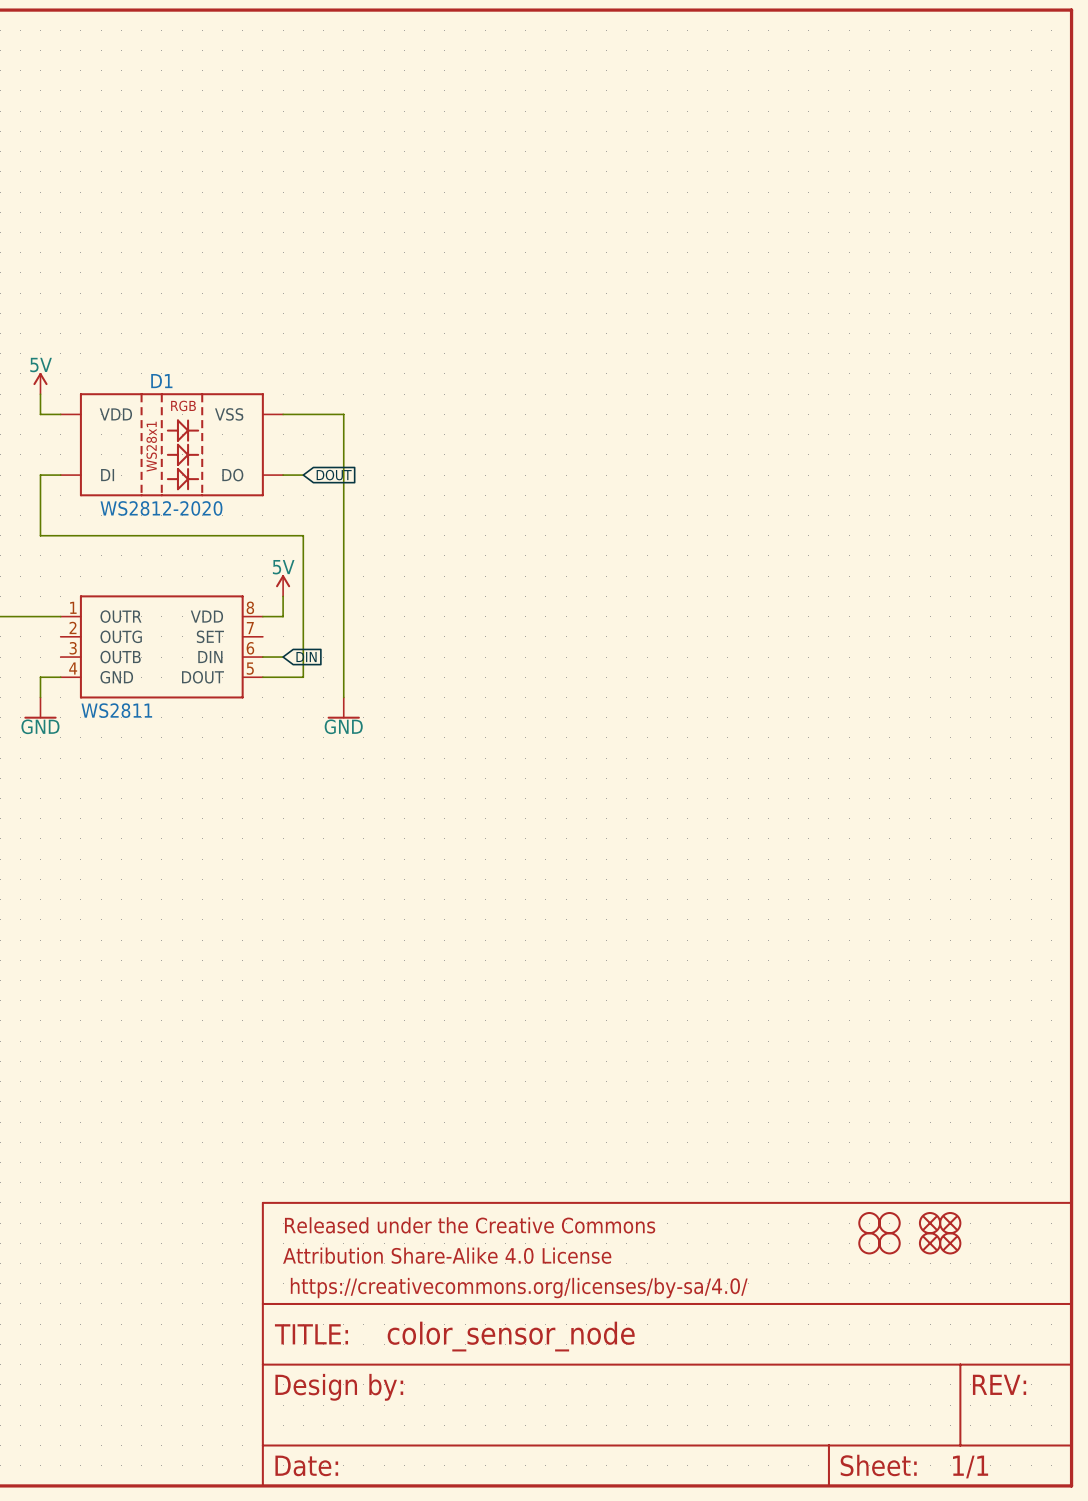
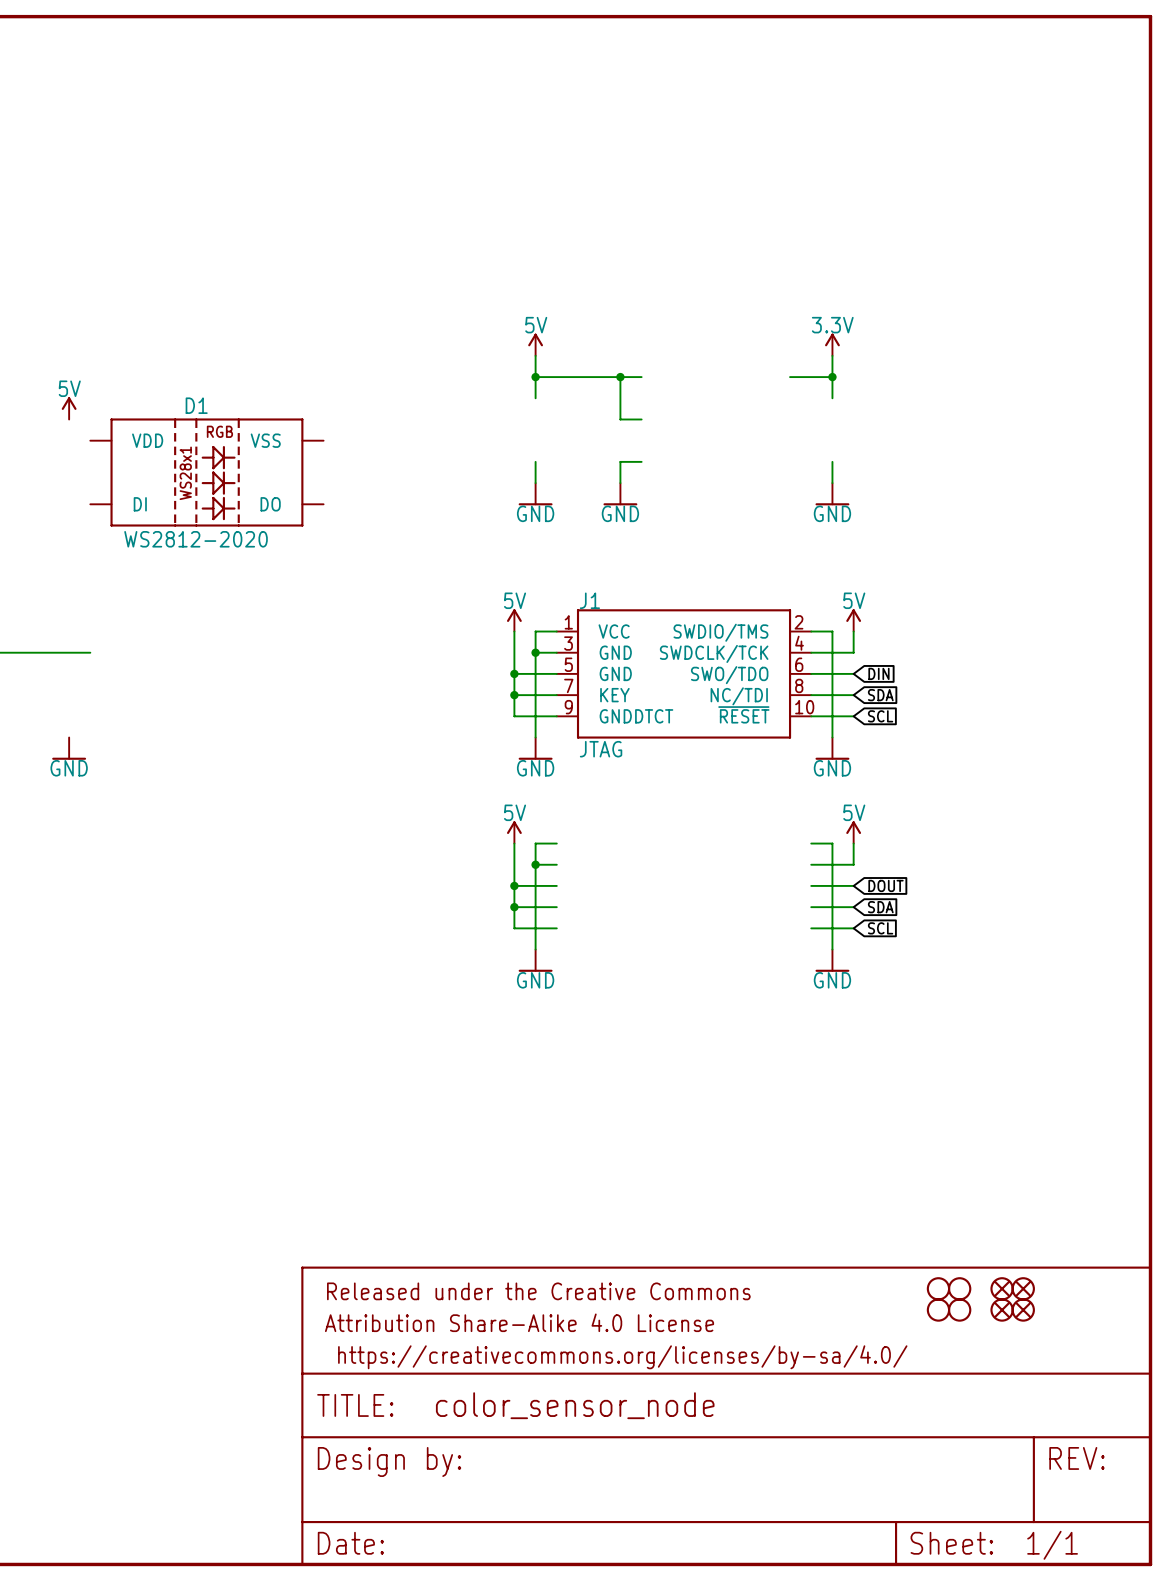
power symbol: none -> 5V (535, 344)
power symbol: none -> 3.3V (832, 344)
wire: none -> (535, 355) (535, 398)
wire: none -> (832, 355) (832, 398)
wire: none -> (535, 377) (641, 377)
junction: none -> (535, 377)
wire: none -> (620, 377) (620, 419) (641, 419)
junction: none -> (620, 377)
wire: none -> (790, 377) (832, 377)
junction: none -> (832, 377)
wire: (40, 394) (40, 414) (60, 414) -> none
wire: (283, 414) (343, 414) (343, 697) -> none
wire: none -> (535, 461) (535, 483)
wire: none -> (641, 461) (620, 461) (620, 483)
wire: none -> (832, 461) (832, 483)
power symbol: none -> GND (535, 494)
power symbol: none -> GND (620, 494)
power symbol: none -> GND (832, 494)
wire: (60, 475) (40, 475) (40, 535) (303, 535) (303, 677) (262, 677) -> none
wire: (283, 475) (303, 475) -> none
global label: DOUT (334, 475) -> none
power symbol: 5V (283, 585) -> none
power symbol: none -> 5V (514, 620)
power symbol: none -> 5V (853, 620)
wire: (283, 596) (283, 616) (262, 616) -> none
wire: none -> (514, 631) (514, 716) (556, 716)
wire: none -> (556, 631) (535, 631) (535, 737)
wire: none -> (811, 631) (832, 631) (832, 737)
wire: none -> (853, 631) (853, 652) (811, 652)
wire: none -> (535, 652) (556, 652)
junction: none -> (535, 652)
wire: none -> (514, 673) (556, 673)
junction: none -> (514, 673)
J1: none -> JTAG (684, 673)
wire: none -> (811, 673) (853, 673)
global label: none -> DIN (878, 673)
part: (161, 646) -> none
wire: (262, 657) (283, 657) -> none
global label: DIN (306, 657) -> none
wire: none -> (514, 695) (556, 695)
junction: none -> (514, 695)
wire: none -> (811, 695) (853, 695)
global label: none -> SDA (880, 695)
wire: (60, 677) (40, 677) (40, 697) -> none
wire: none -> (811, 716) (853, 716)
global label: none -> SCL (880, 716)
power symbol: GND (343, 708) -> none
power symbol: none -> GND (535, 748)
power symbol: none -> GND (832, 748)
power symbol: none -> 5V (514, 832)
power symbol: none -> 5V (853, 832)
wire: none -> (514, 843) (514, 928) (556, 928)
wire: none -> (556, 843) (535, 843) (535, 949)
wire: none -> (811, 843) (832, 843) (832, 949)
wire: none -> (853, 843) (853, 864) (811, 864)
wire: none -> (535, 864) (556, 864)
junction: none -> (535, 864)
wire: none -> (514, 885) (556, 885)
junction: none -> (514, 885)
wire: none -> (811, 885) (853, 885)
global label: none -> DOUT (886, 885)
wire: none -> (514, 907) (556, 907)
junction: none -> (514, 907)
wire: none -> (811, 907) (853, 907)
global label: none -> SDA (880, 907)
wire: none -> (811, 928) (853, 928)
global label: none -> SCL (880, 928)
power symbol: none -> GND (535, 960)
power symbol: none -> GND (832, 960)

